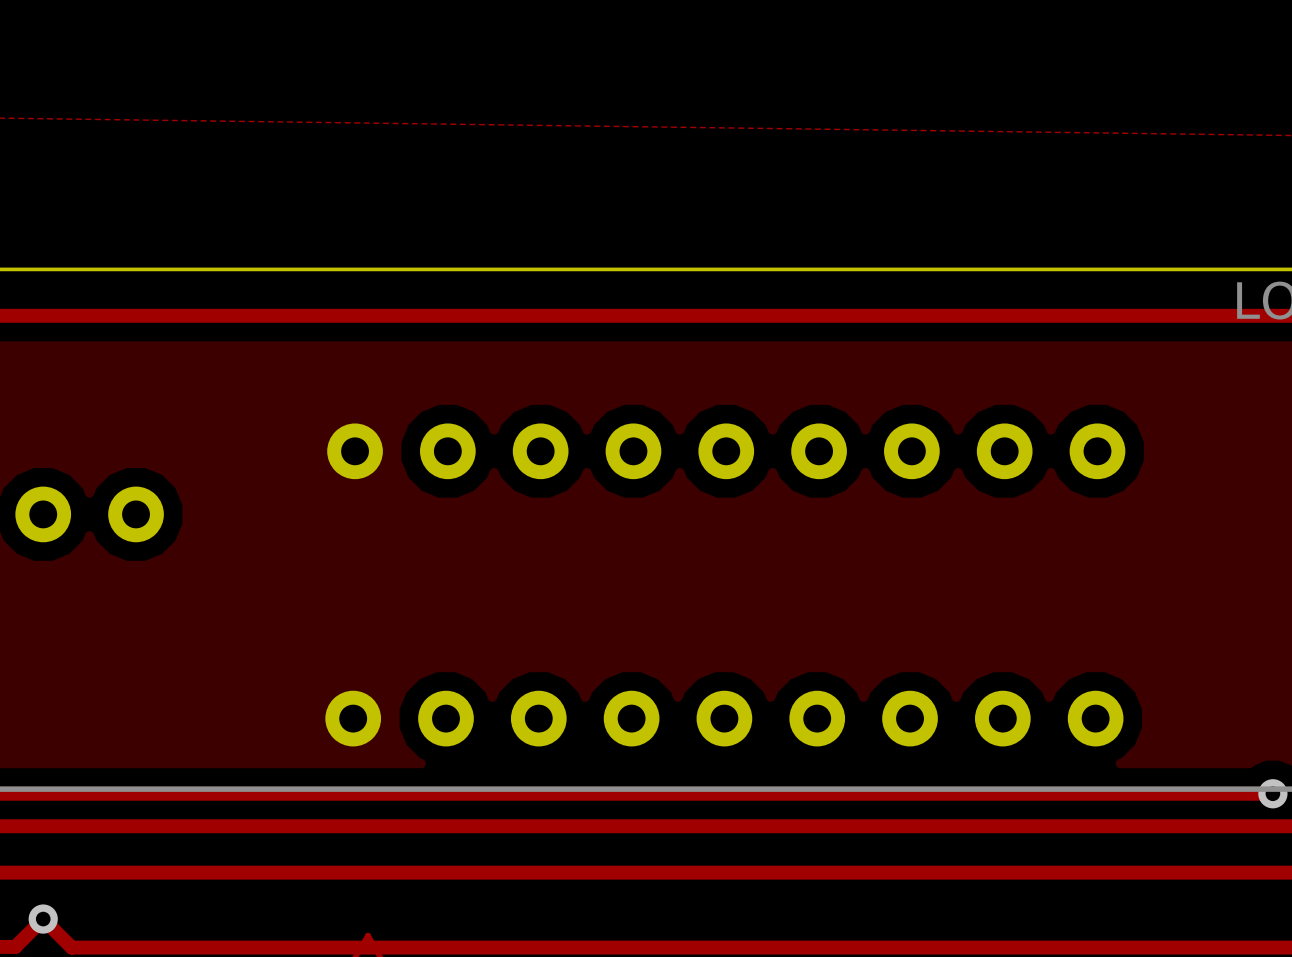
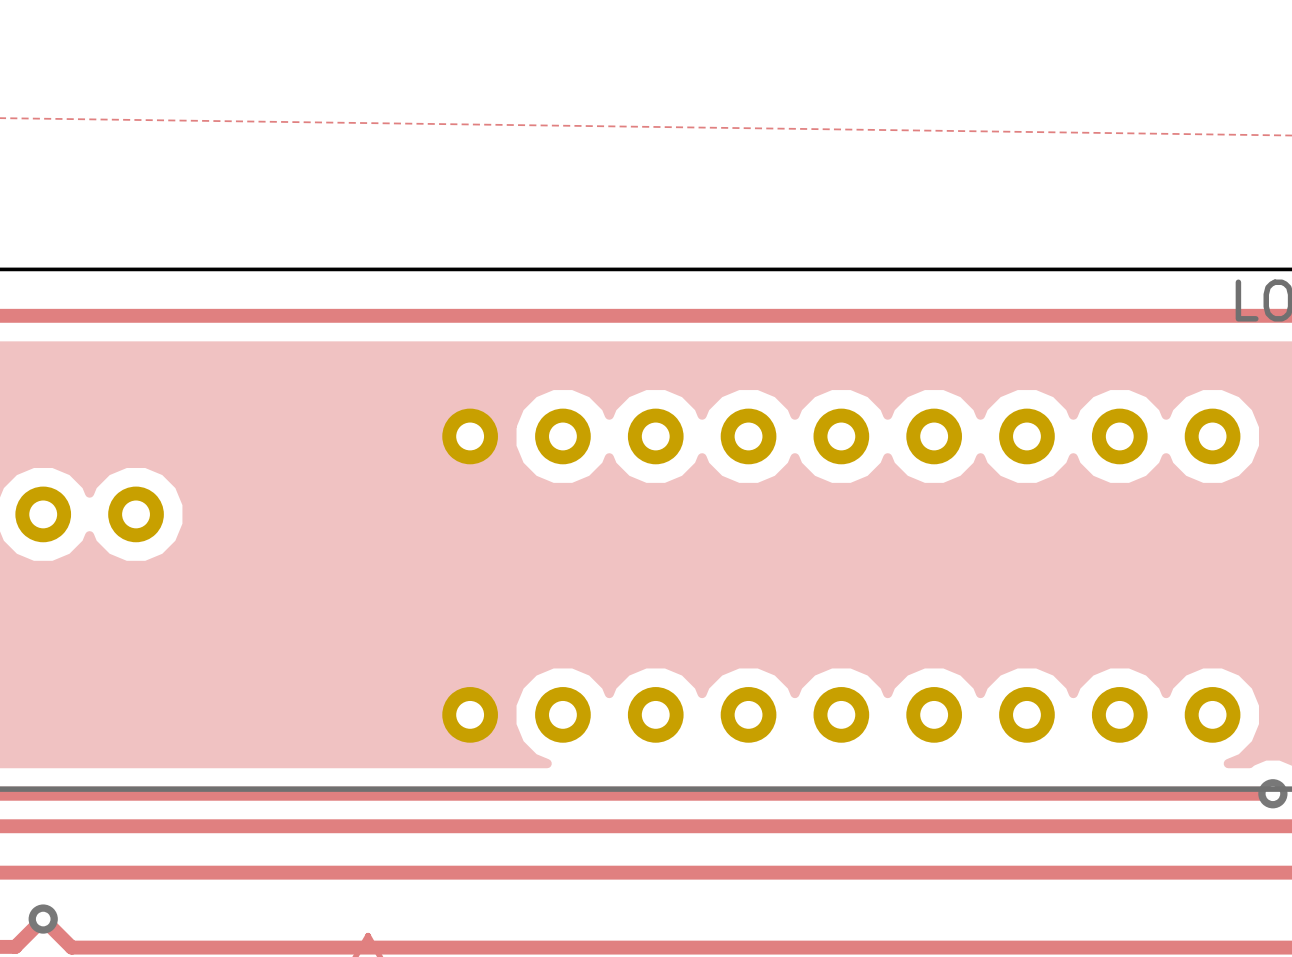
part position: (726, 451) -> (841, 436)
part position: (724, 718) -> (841, 714)

